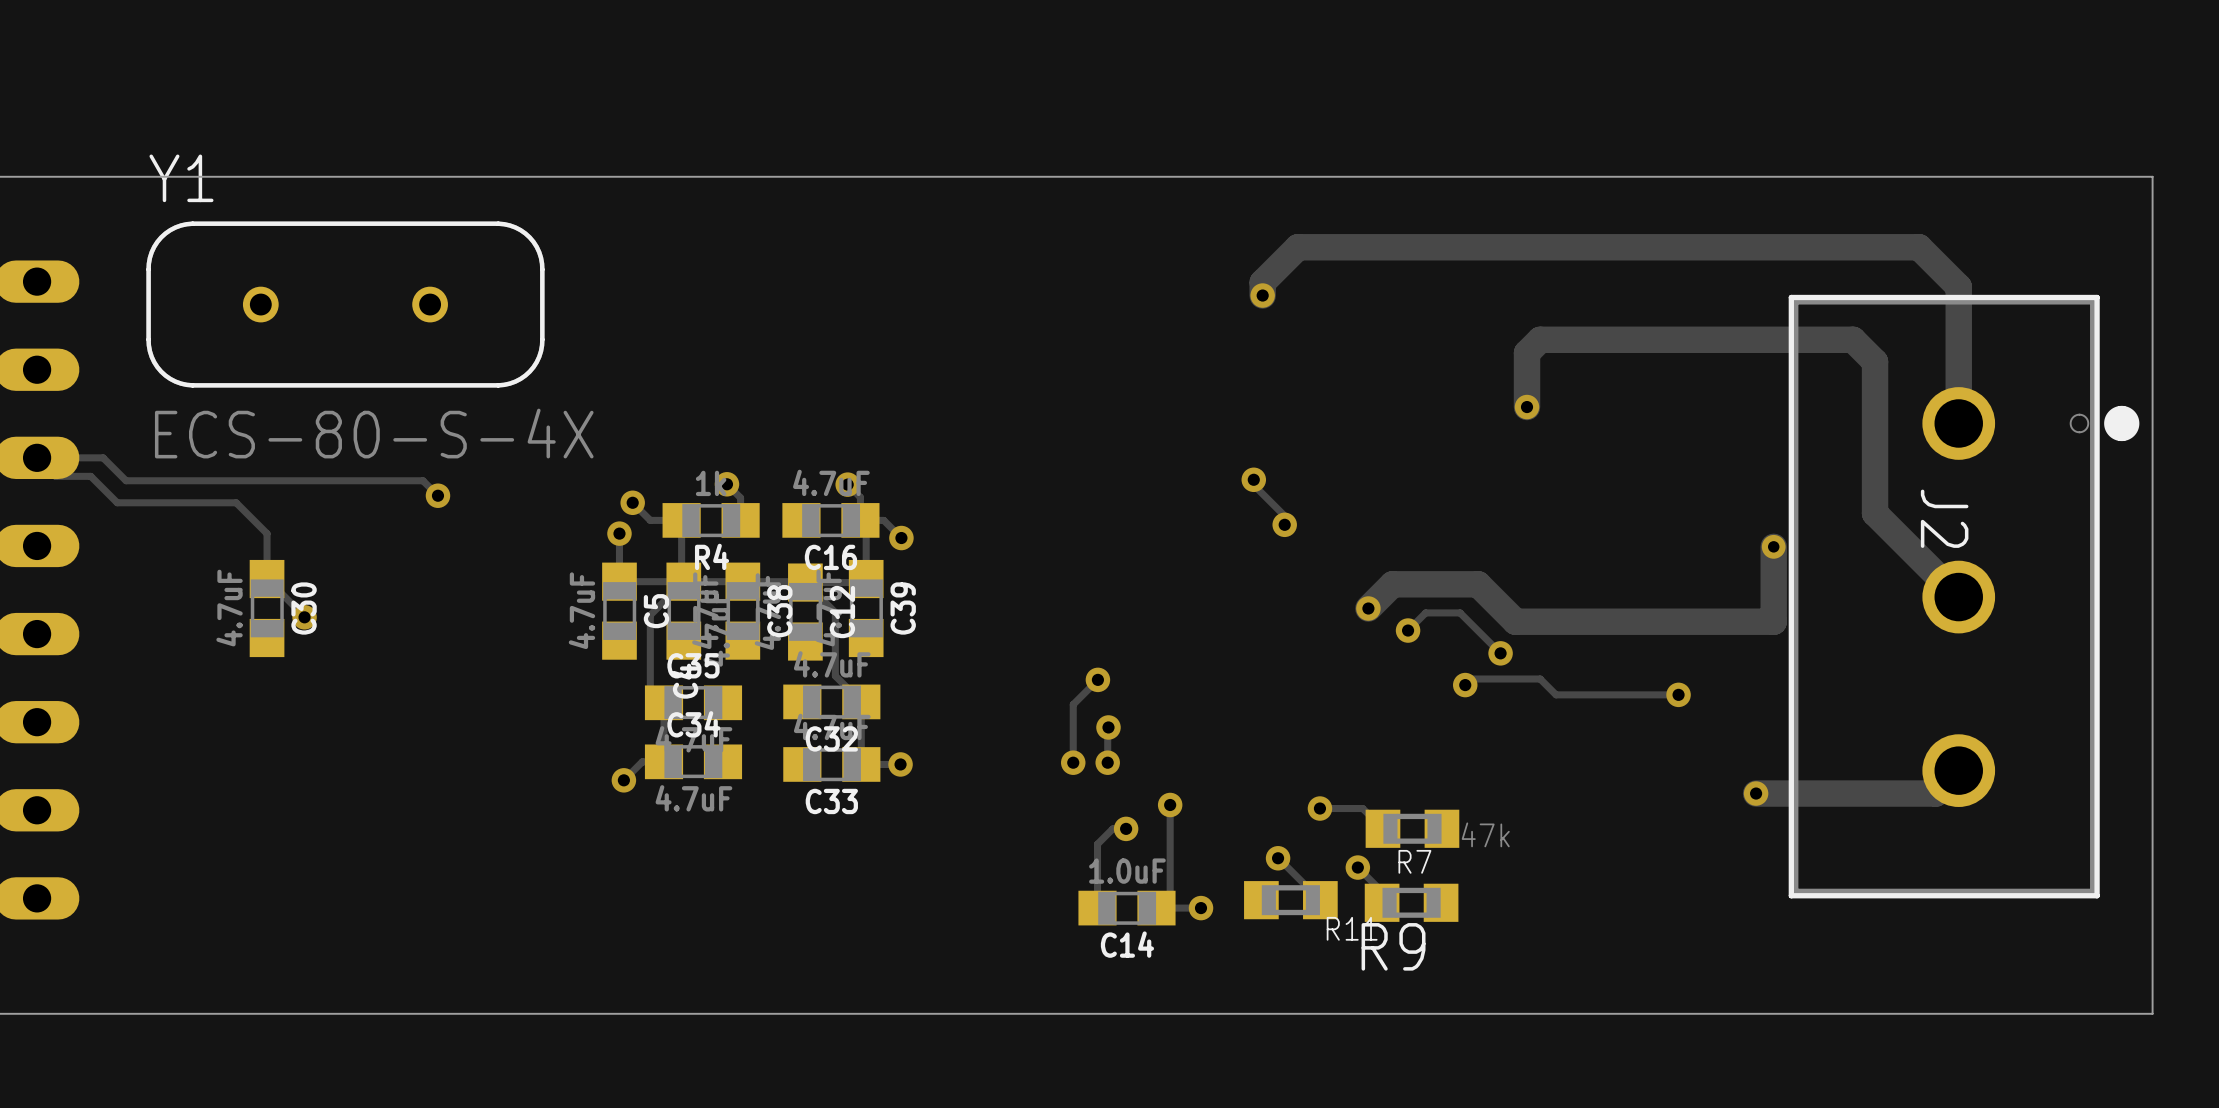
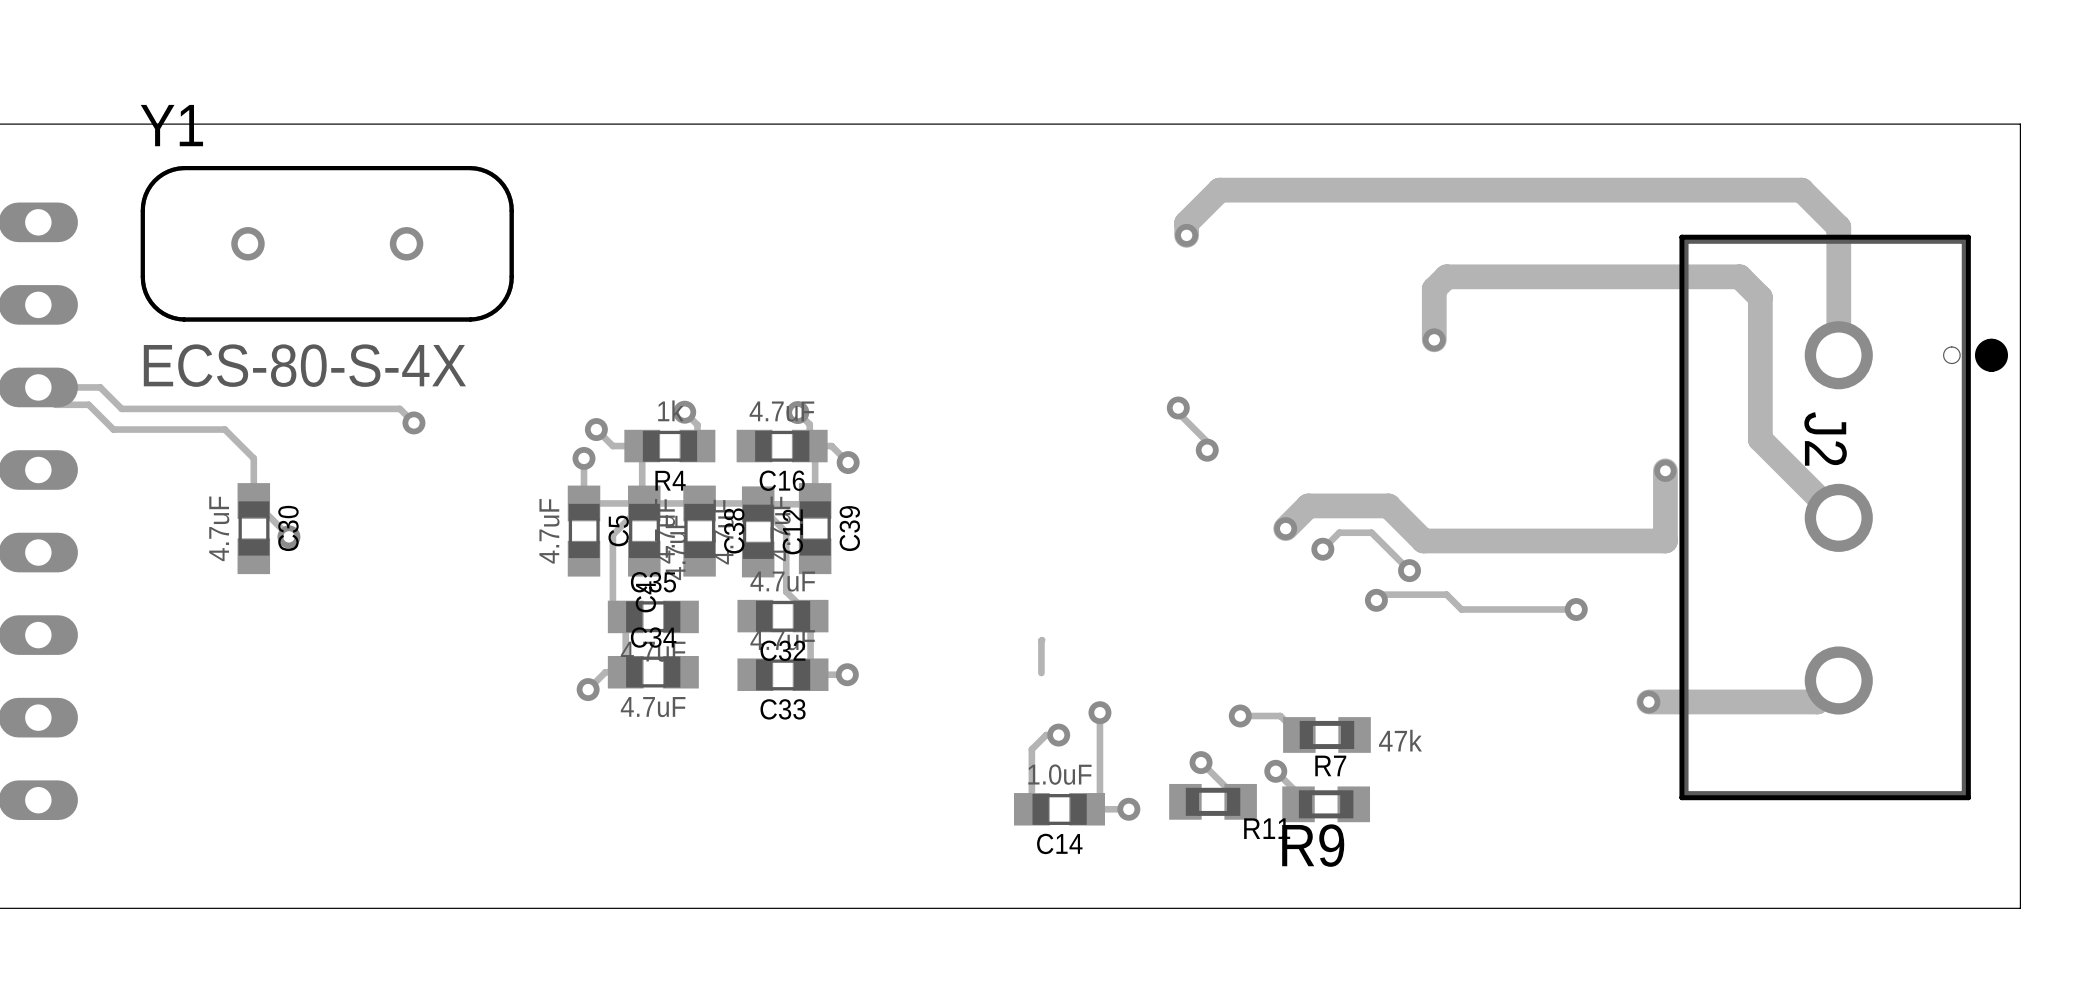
track: (1097, 679) (1073, 704) (1073, 762) -> none
via: (1097, 679) -> none
via: (1108, 727) -> none
via: (1073, 762) -> none
via: (1107, 762) -> none

